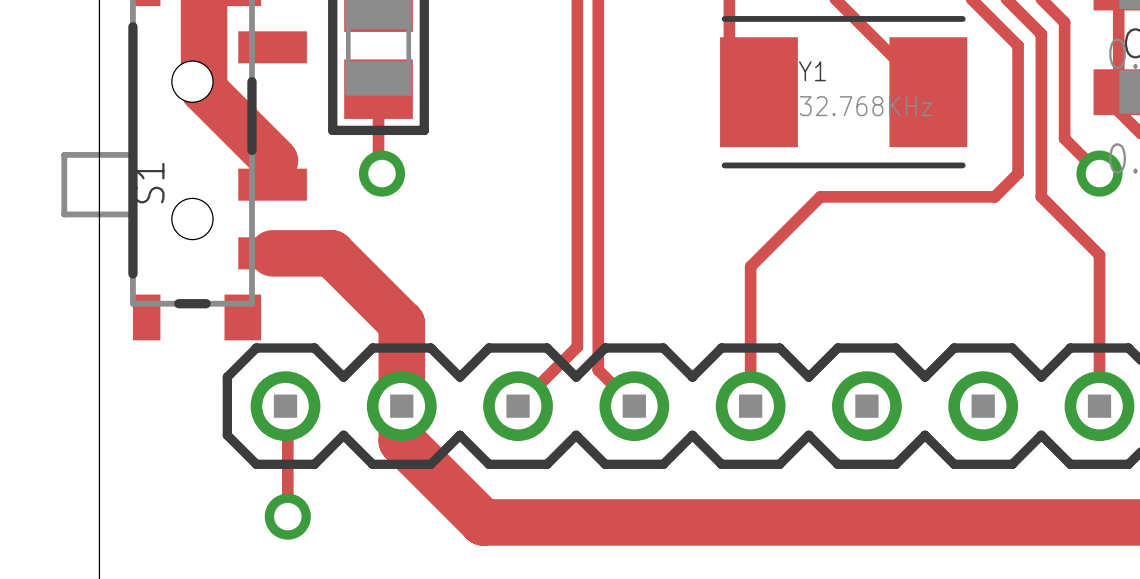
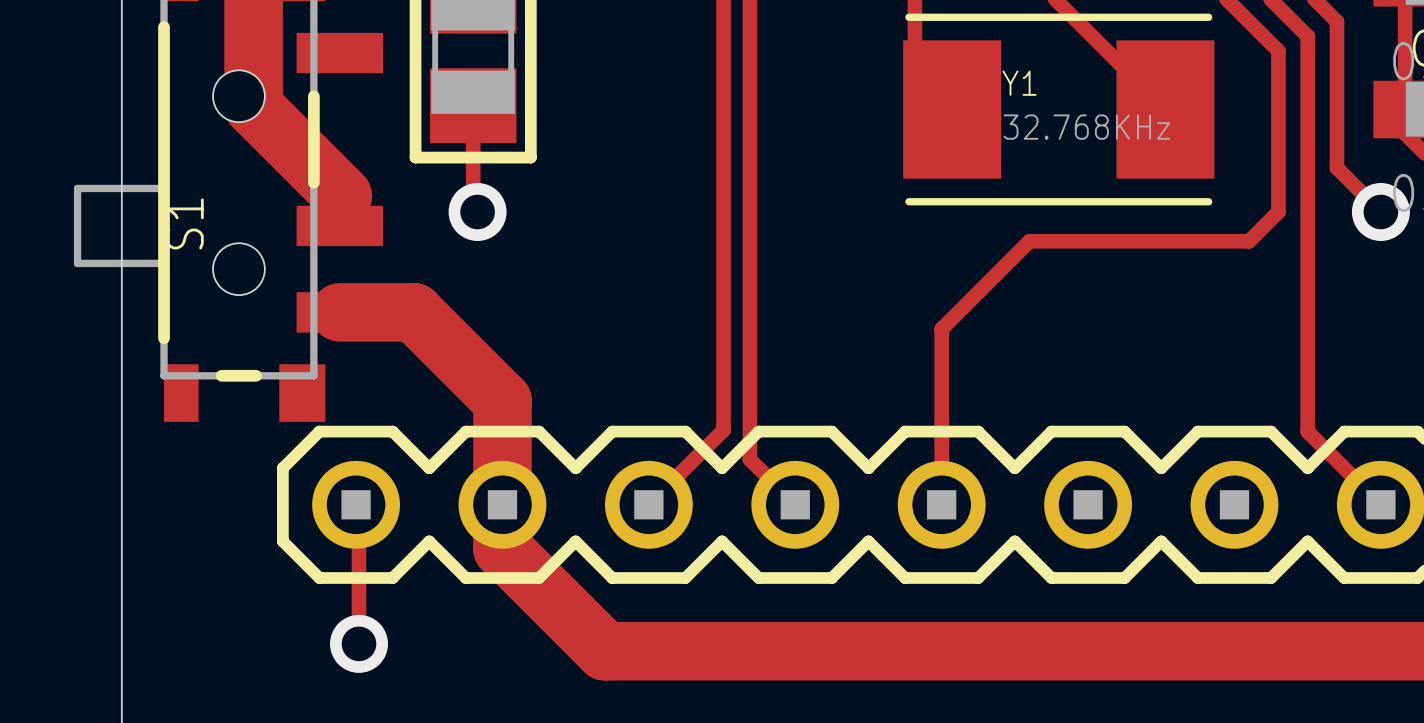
track: (1041, 196) (1099, 254) (1099, 406) -> (1307, 241) (1307, 431) (1380, 504)

